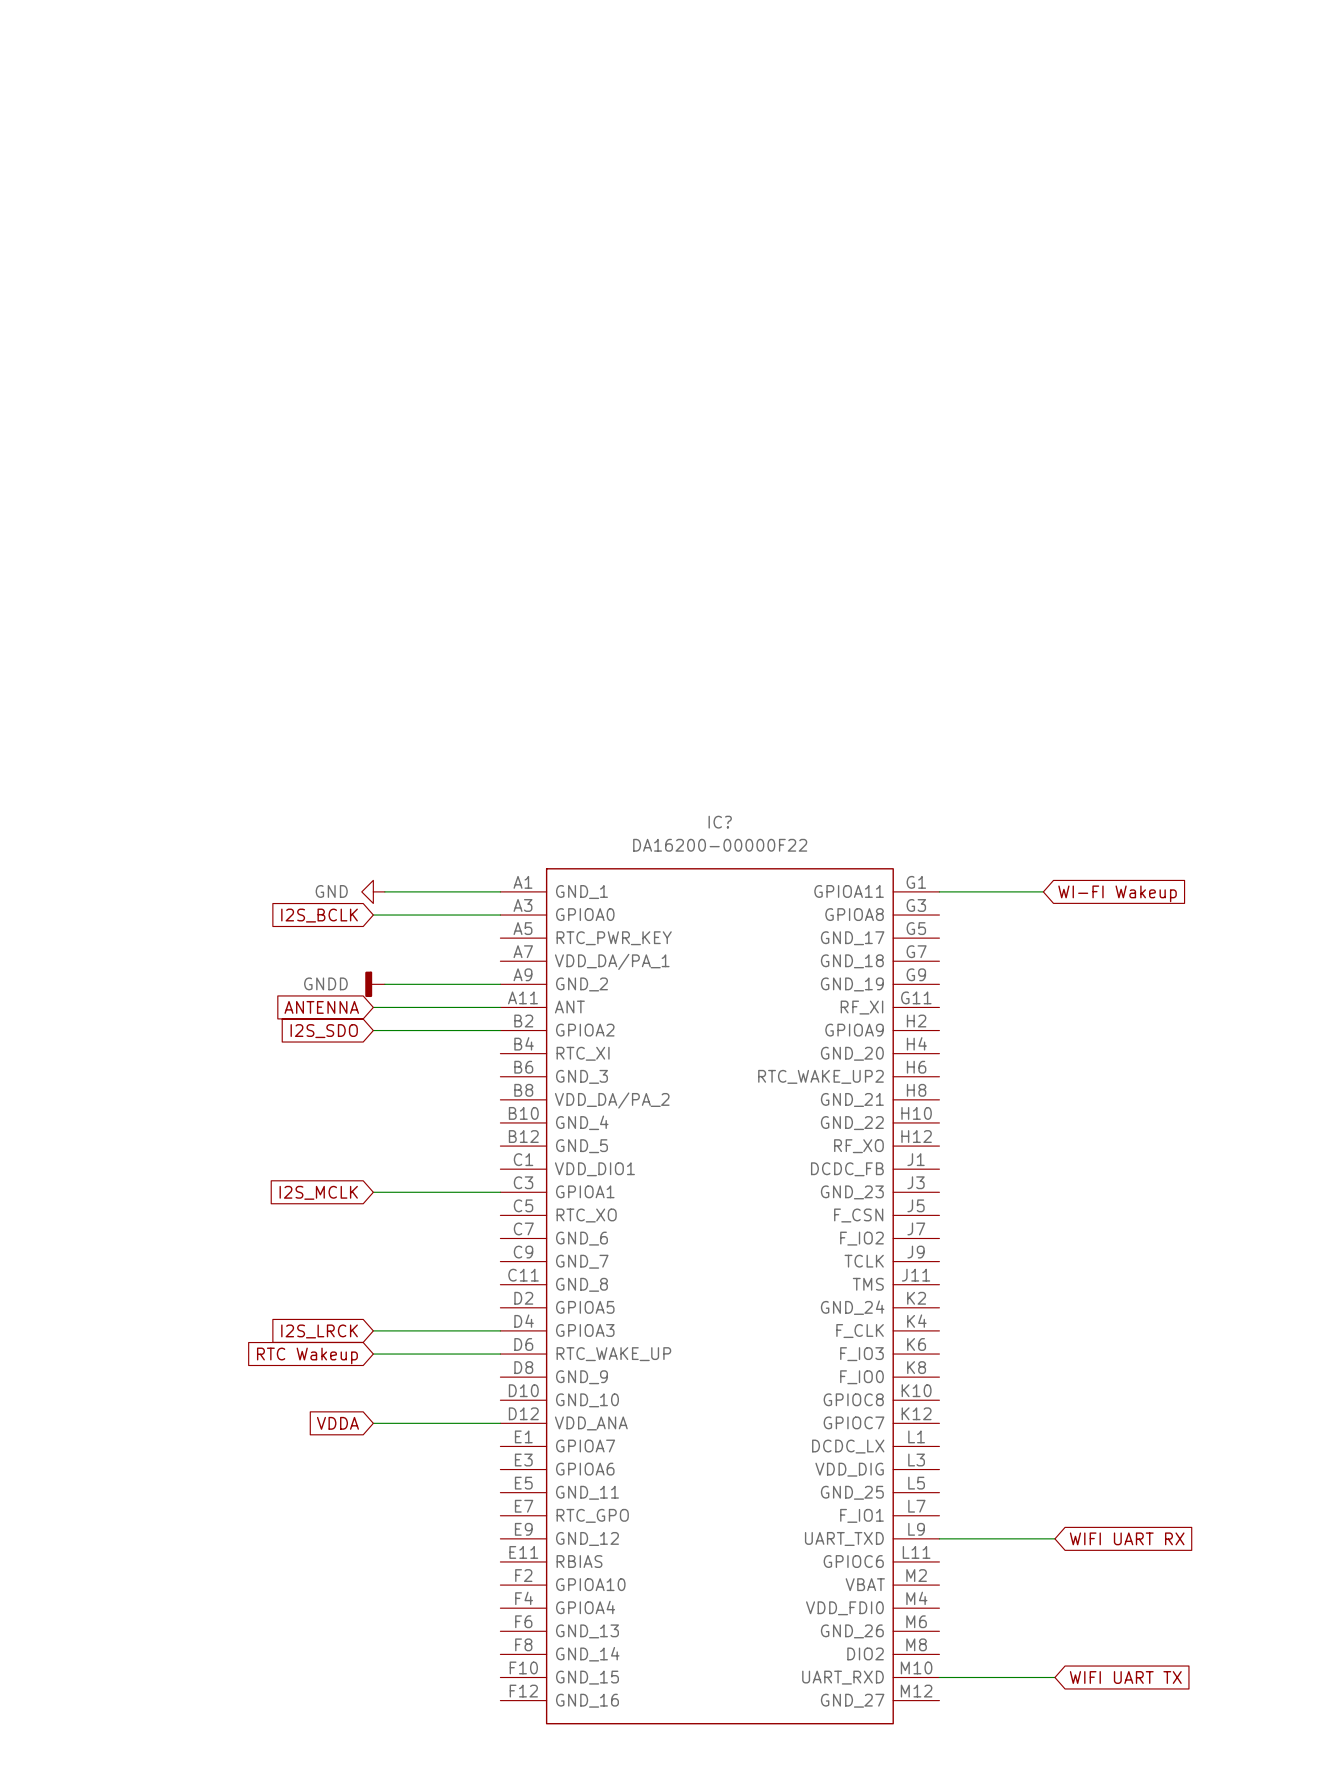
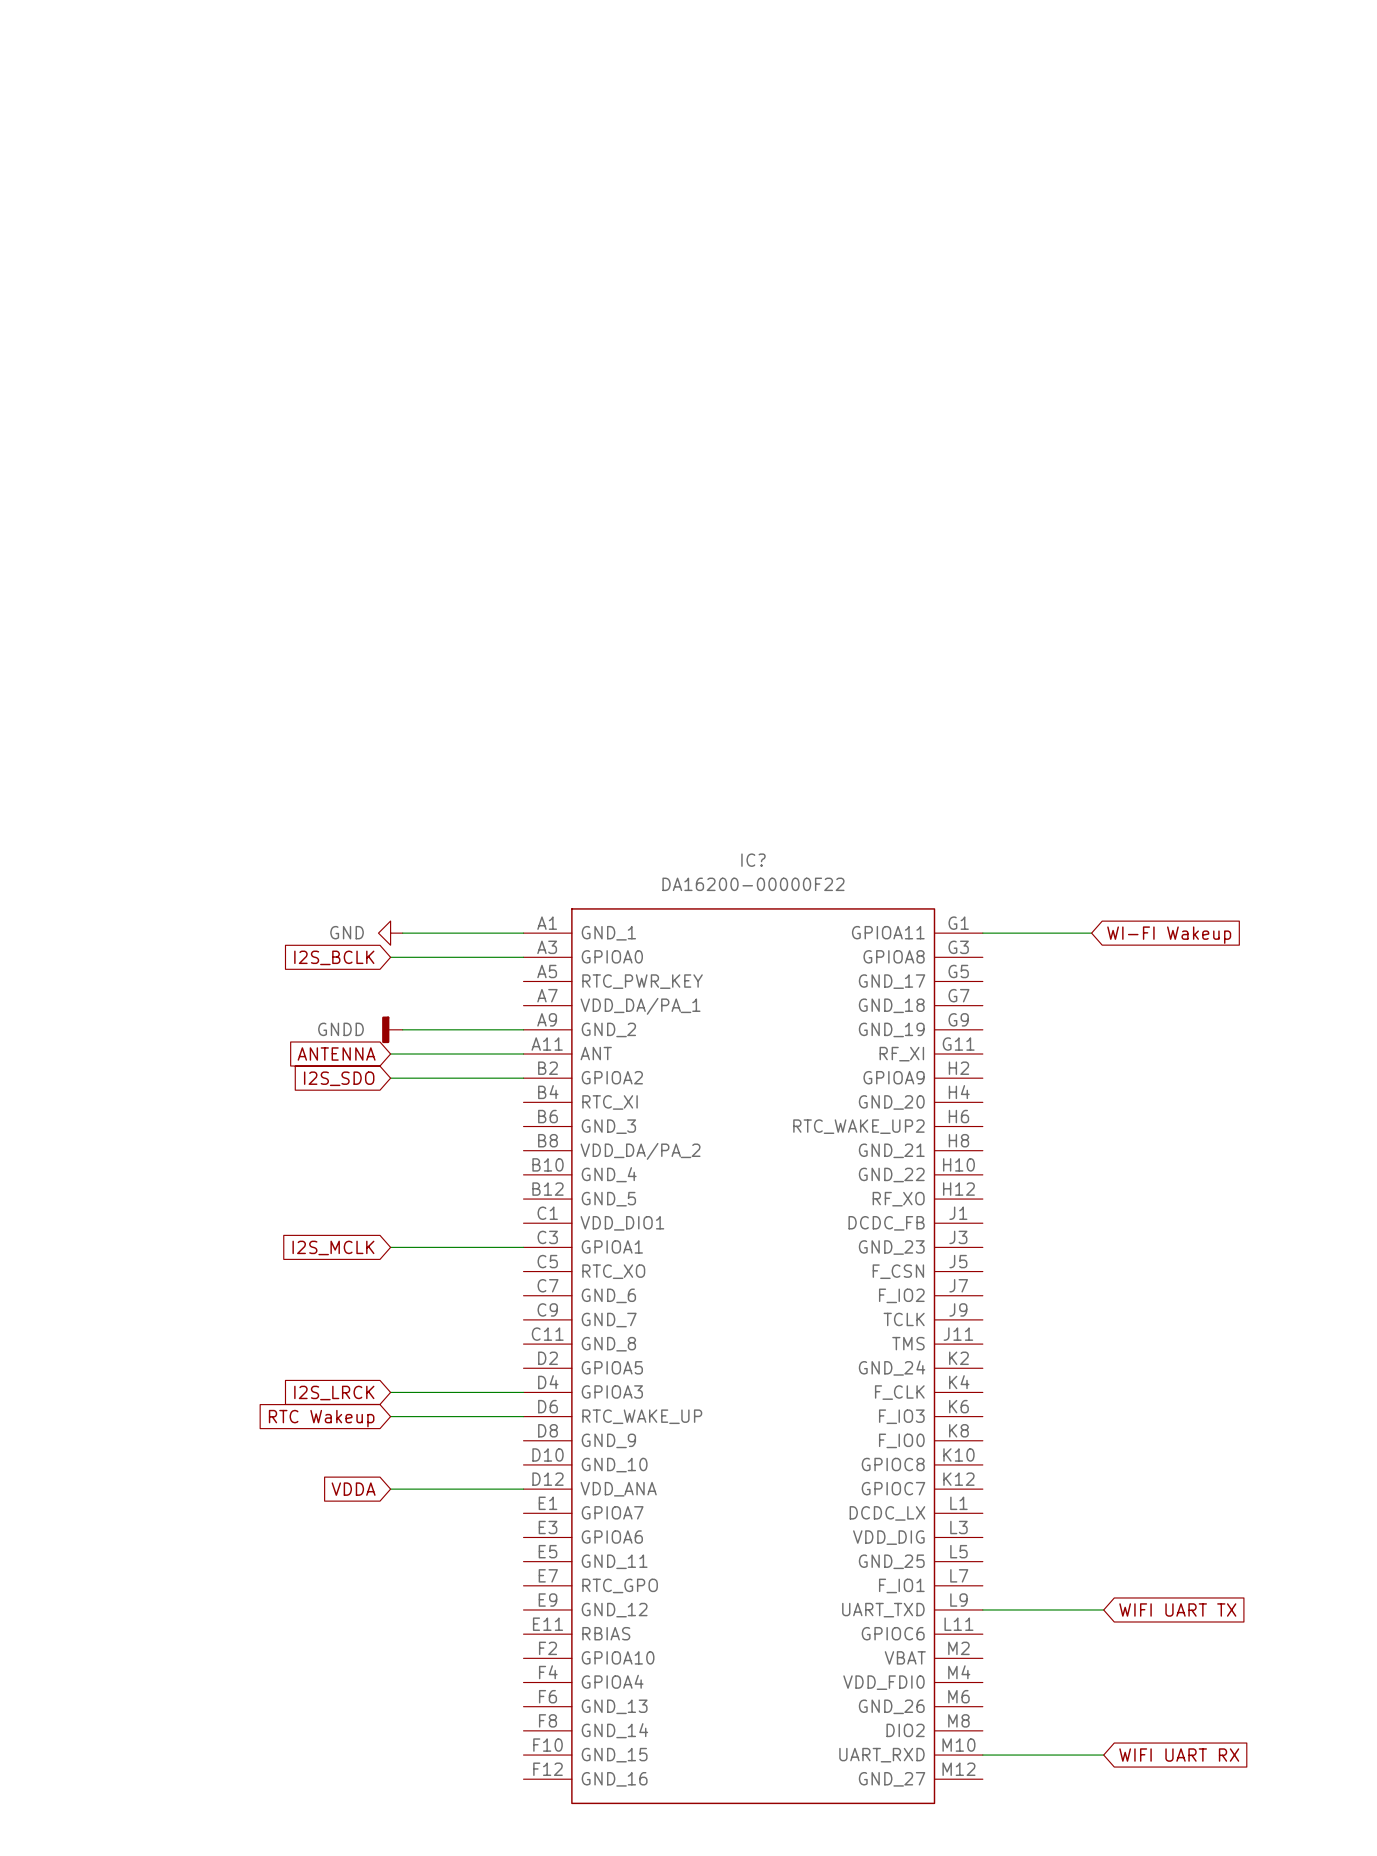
global label: WIFI UART RX (1127, 1538) -> WIFI UART TX (1177, 1609)
global label: WIFI UART TX (1125, 1677) -> WIFI UART RX (1179, 1755)

